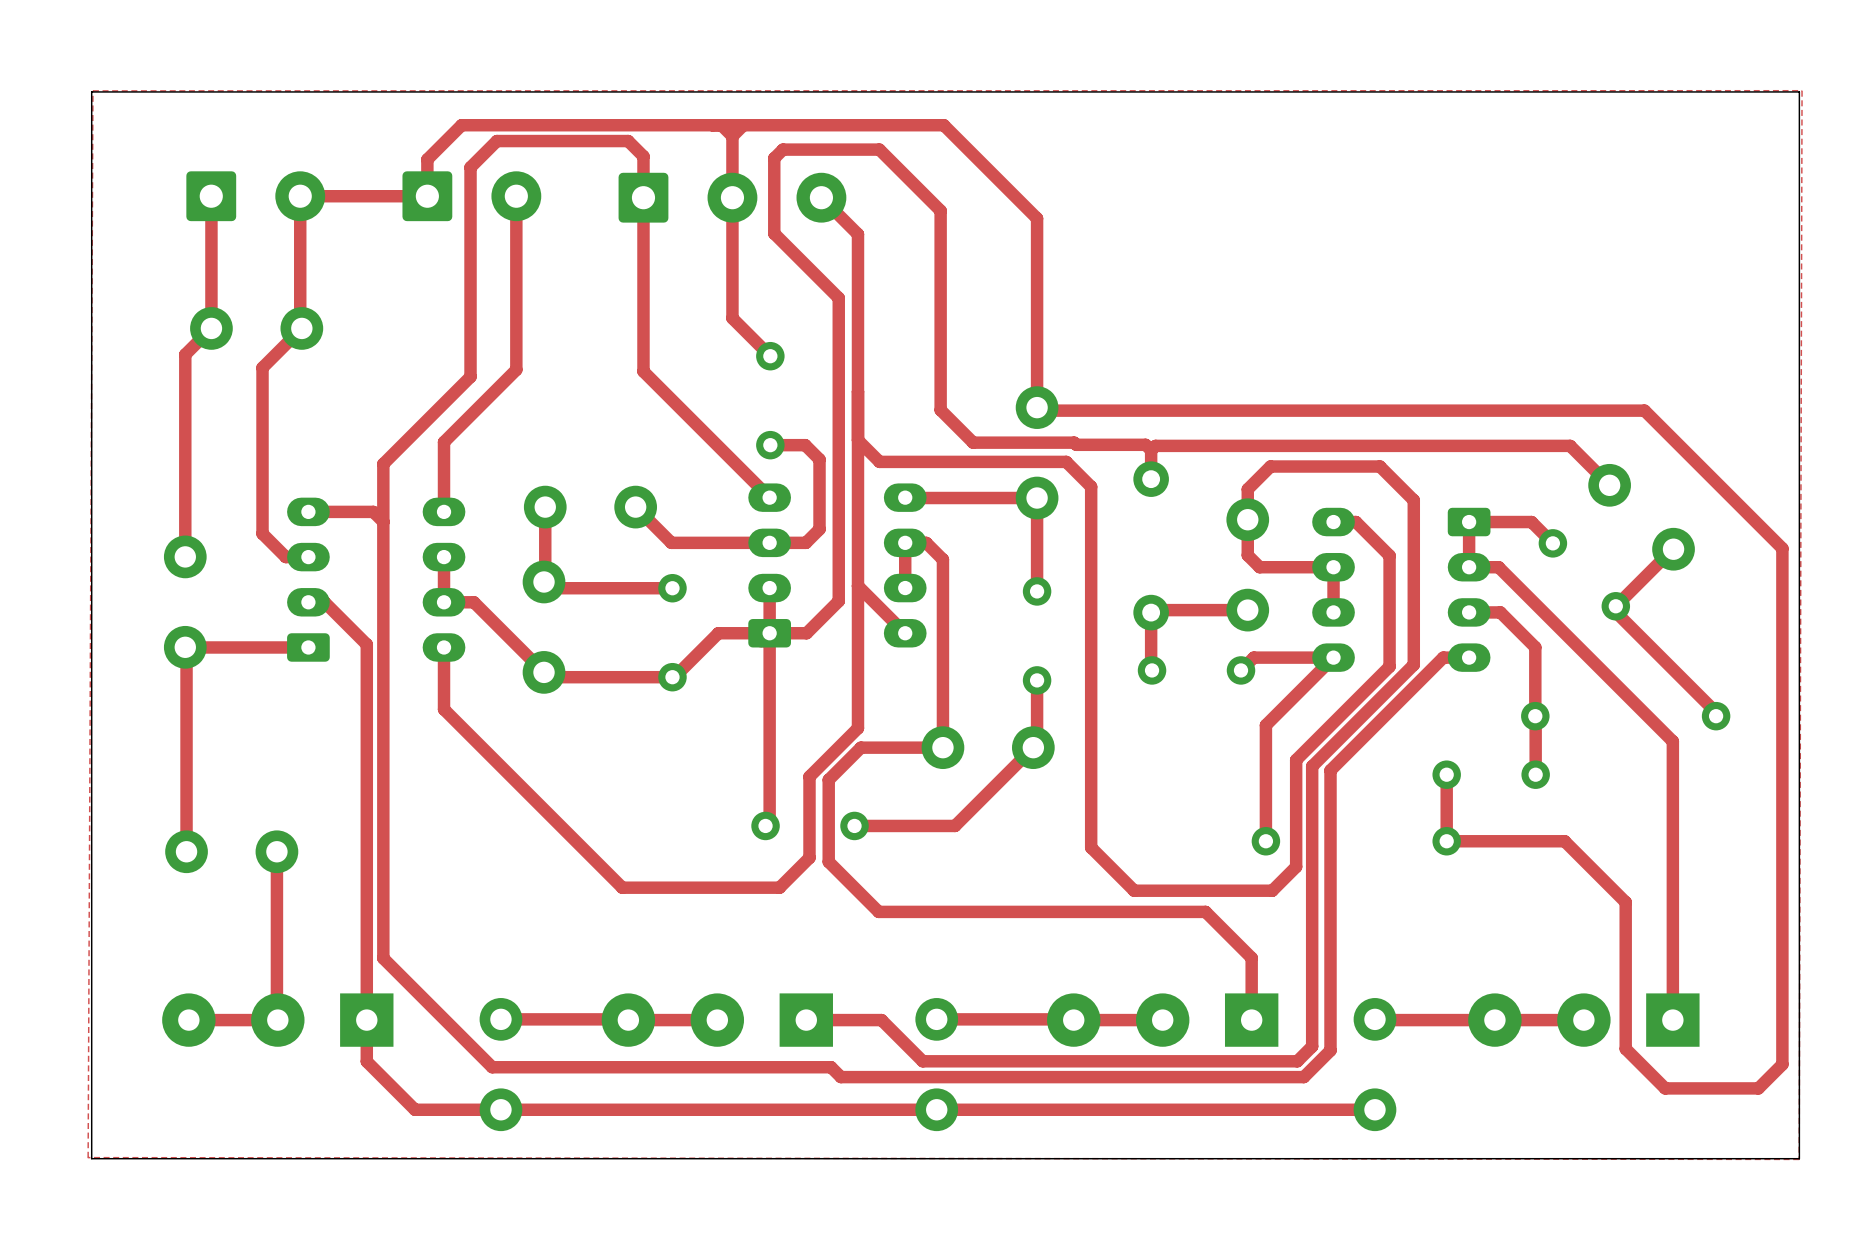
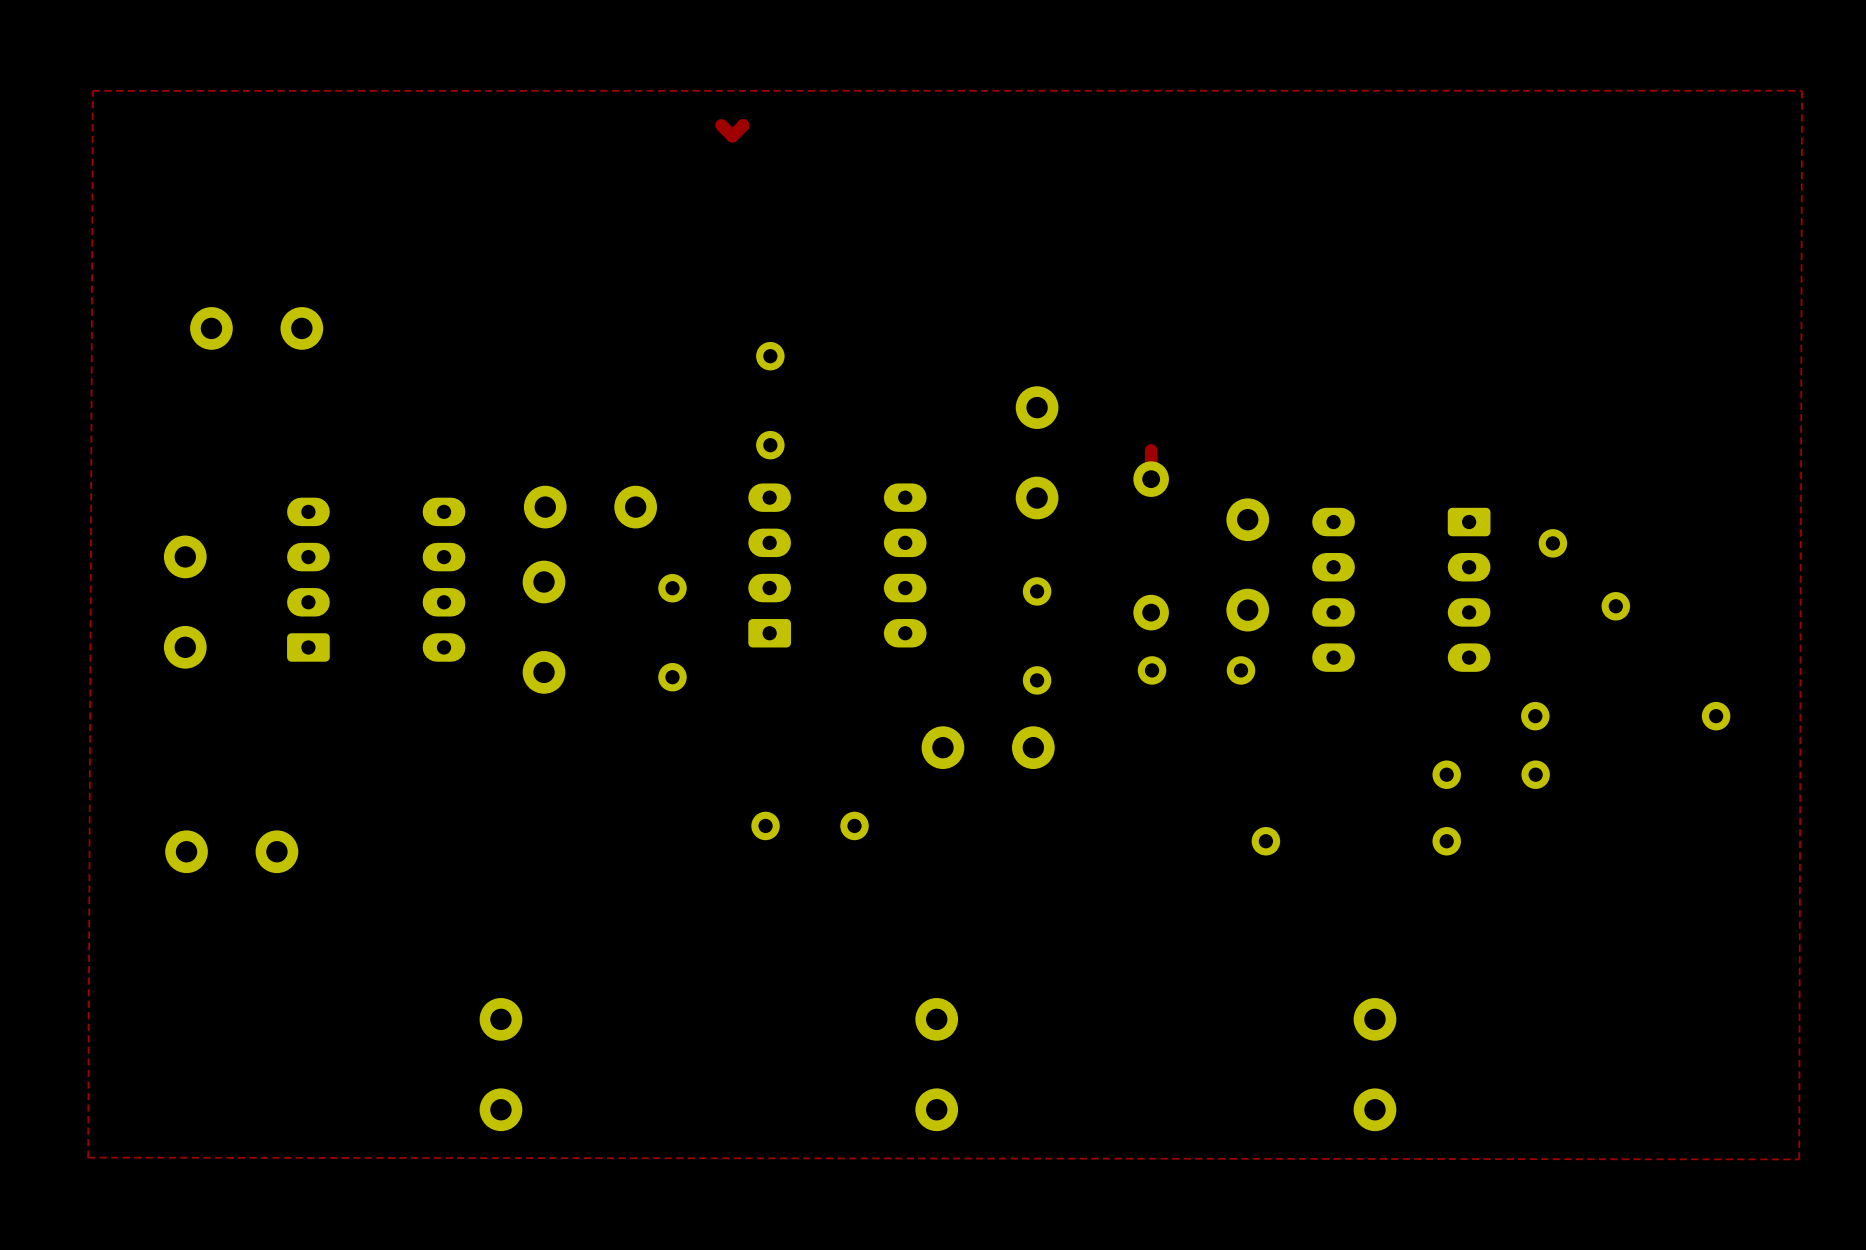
board edge: (91, 91) (1799, 91) (1799, 1158) (91, 1158) (91, 91) -> none
top track: (732, 136) (732, 318) (770, 356) -> none
top track: (211, 196) (211, 328) (185, 354) (185, 556) -> none
part: (255, 196) -> none
part: (471, 196) -> none
top track: (516, 196) (516, 369) (444, 442) (444, 511) -> none
part: (732, 197) -> none
top track: (821, 197) (857, 234) (857, 728) (809, 776) (809, 857) (779, 887) (622, 887) (444, 709) (444, 647) -> none
top track: (857, 440) (879, 461) (1066, 461) (1091, 486) (1091, 847) (1134, 890) (1272, 890) (1296, 866) (1296, 760) (1389, 666) (1389, 555) (1355, 522) (1333, 522) -> none
top track: (770, 445) (805, 445) (819, 459) (819, 529) (805, 542) (671, 542) (635, 507) -> none
top track: (1609, 485) (1570, 445) (1155, 445) (1151, 450) (1145, 444) (973, 442) (940, 410) (940, 210) (879, 149) (782, 149) (774, 158) (774, 233) (838, 298) (838, 601) (806, 633) (718, 633) (674, 677) (551, 677) (546, 672) (544, 672) (473, 602) (444, 602) (444, 557) -> none
top track: (769, 497) (643, 371) (643, 156) (628, 141) (496, 141) (470, 167) (470, 376) (383, 464) (383, 958) (492, 1067) (831, 1067) (840, 1077) (1303, 1077) (1330, 1050) (1330, 770) (1443, 657) (1469, 657) -> none
top track: (905, 497) (1037, 498) (1037, 591) -> none
top track: (545, 507) (544, 582) (550, 588) (672, 588) -> none
top track: (308, 511) (373, 511) (383, 521) -> none
part: (1641, 517) -> none
top track: (1552, 543) (1531, 522) (1469, 522) (1469, 567) (1498, 567) (1672, 741) (1672, 1020) -> none
top track: (1673, 549) (1615, 606) (1615, 612) (1716, 712) (1716, 716) -> none
top track: (308, 557) (285, 557) (262, 533) (262, 367) (301, 328) (300, 326) (300, 196) (427, 196) (427, 159) (461, 125) (943, 125) (1037, 218) (1037, 407) (1040, 410) (1644, 410) (1782, 548) (1782, 1064) (1758, 1088) (1665, 1088) (1625, 1048) (1625, 902) (1564, 841) (1446, 841) (1446, 774) -> none
top track: (857, 586) (905, 633) -> none
top track: (769, 588) (769, 821) (765, 825) -> none
top track: (905, 588) (905, 542) (926, 542) (942, 559) (942, 747) (860, 747) (828, 779) (828, 861) (878, 911) (1205, 911) (1251, 957) (1251, 1020) -> none
top track: (308, 602) (324, 602) (366, 644) (366, 1061) (415, 1109) (1374, 1109) -> none
top track: (1247, 610) (1154, 610) (1151, 612) (1152, 670) -> none
top track: (1333, 612) (1333, 567) (1259, 567) (1247, 555) (1247, 489) (1270, 466) (1379, 466) (1413, 500) (1413, 664) (1312, 766) (1312, 1046) (1297, 1061) (922, 1061) (881, 1020) (806, 1020) -> none
top track: (1469, 612) (1500, 612) (1535, 647) (1535, 774) -> none
top track: (185, 647) (186, 851) -> none
top track: (185, 647) (308, 647) -> none
top track: (1241, 670) (1253, 657) (1333, 657) (1265, 725) (1265, 841) -> none
top track: (1037, 680) (1037, 743) -> none
top track: (1037, 743) (955, 825) (854, 825) -> none
top track: (276, 851) (277, 1020) (189, 1019) -> none
top track: (500, 1019) (717, 1020) -> none
top track: (936, 1019) (1162, 1020) -> none
top track: (1374, 1019) (1583, 1020) -> none
part: (277, 1020) -> none
part: (717, 1020) -> none
part: (1162, 1020) -> none
part: (1583, 1020) -> none

